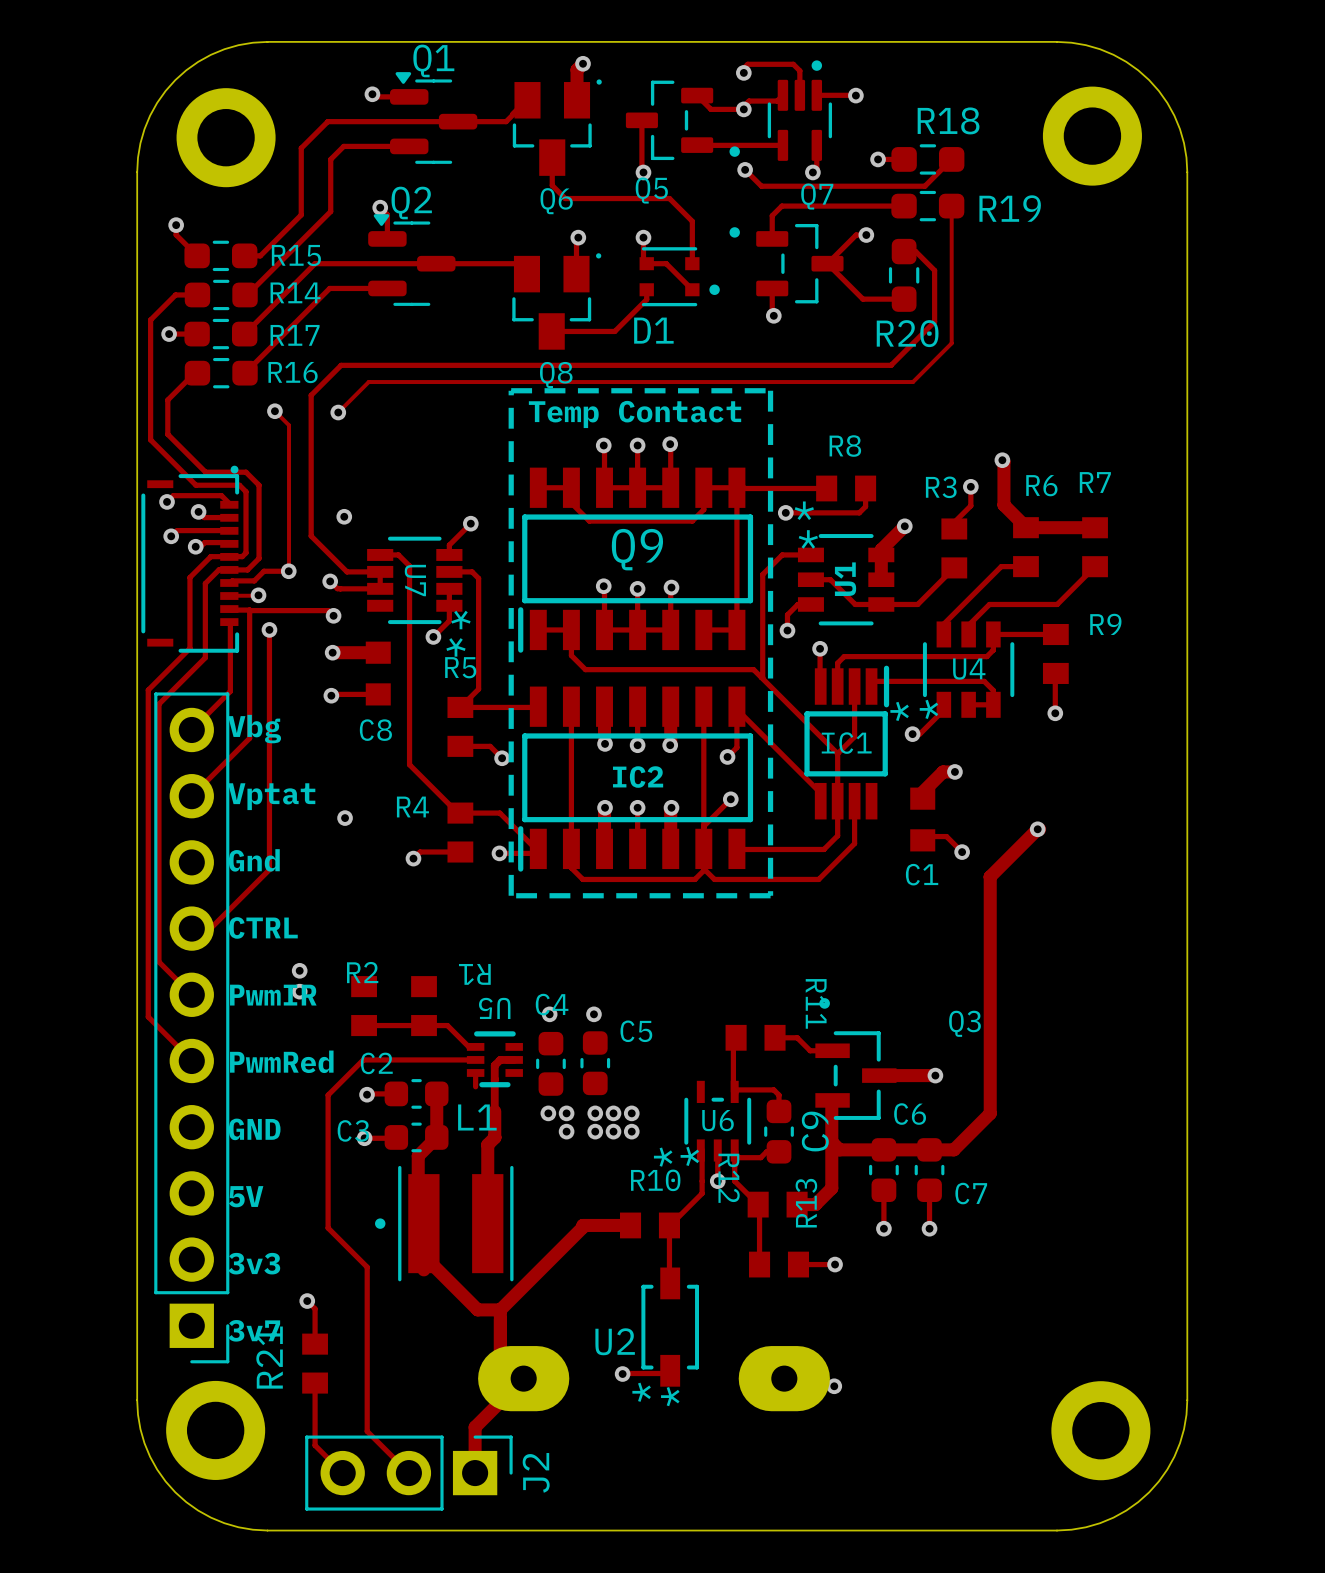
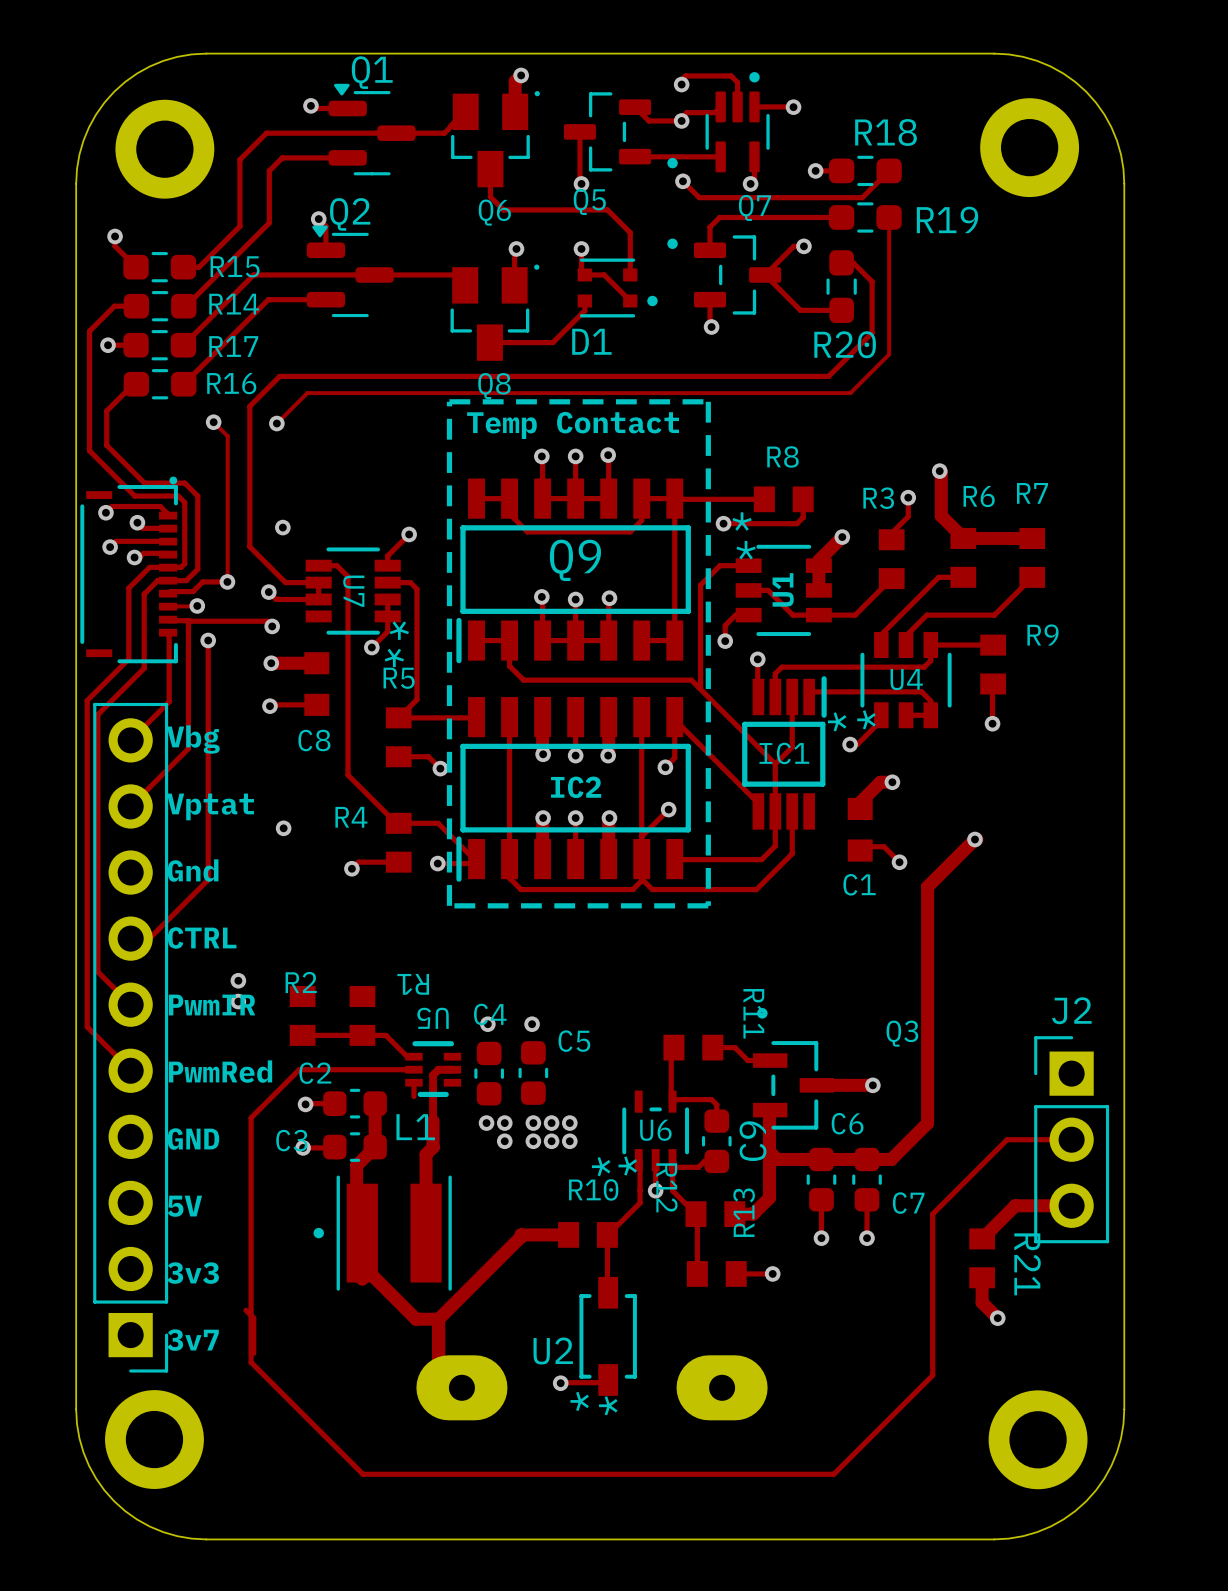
track: (363, 1059) (328, 1095) (328, 1228) (367, 1267) (367, 1431) (408, 1473) -> (301, 1069) (299, 1069) (251, 1117) (251, 1362) (362, 1474) (833, 1474) (932, 1375) (932, 1214) (1007, 1139) (1071, 1139)
track: none -> (1071, 1205) (1015, 1205) (982, 1238)
track: none -> (982, 1277) (982, 1302) (997, 1318)
via: (307, 1301) -> none
via: none -> (997, 1318)
R21 name rotation: 0° (269, 1357) -> 180° (1027, 1264)
R21 position: (315, 1363) -> (982, 1258)
track: (523, 1378) (475, 1427) (475, 1473) -> none
track: (315, 1383) (315, 1445) (342, 1473) -> none
via: (834, 1386) -> none
J2 rotation: 0° (408, 1473) -> 90° counterclockwise (1071, 1139)
J2 position: (408, 1473) -> (1071, 1139)

